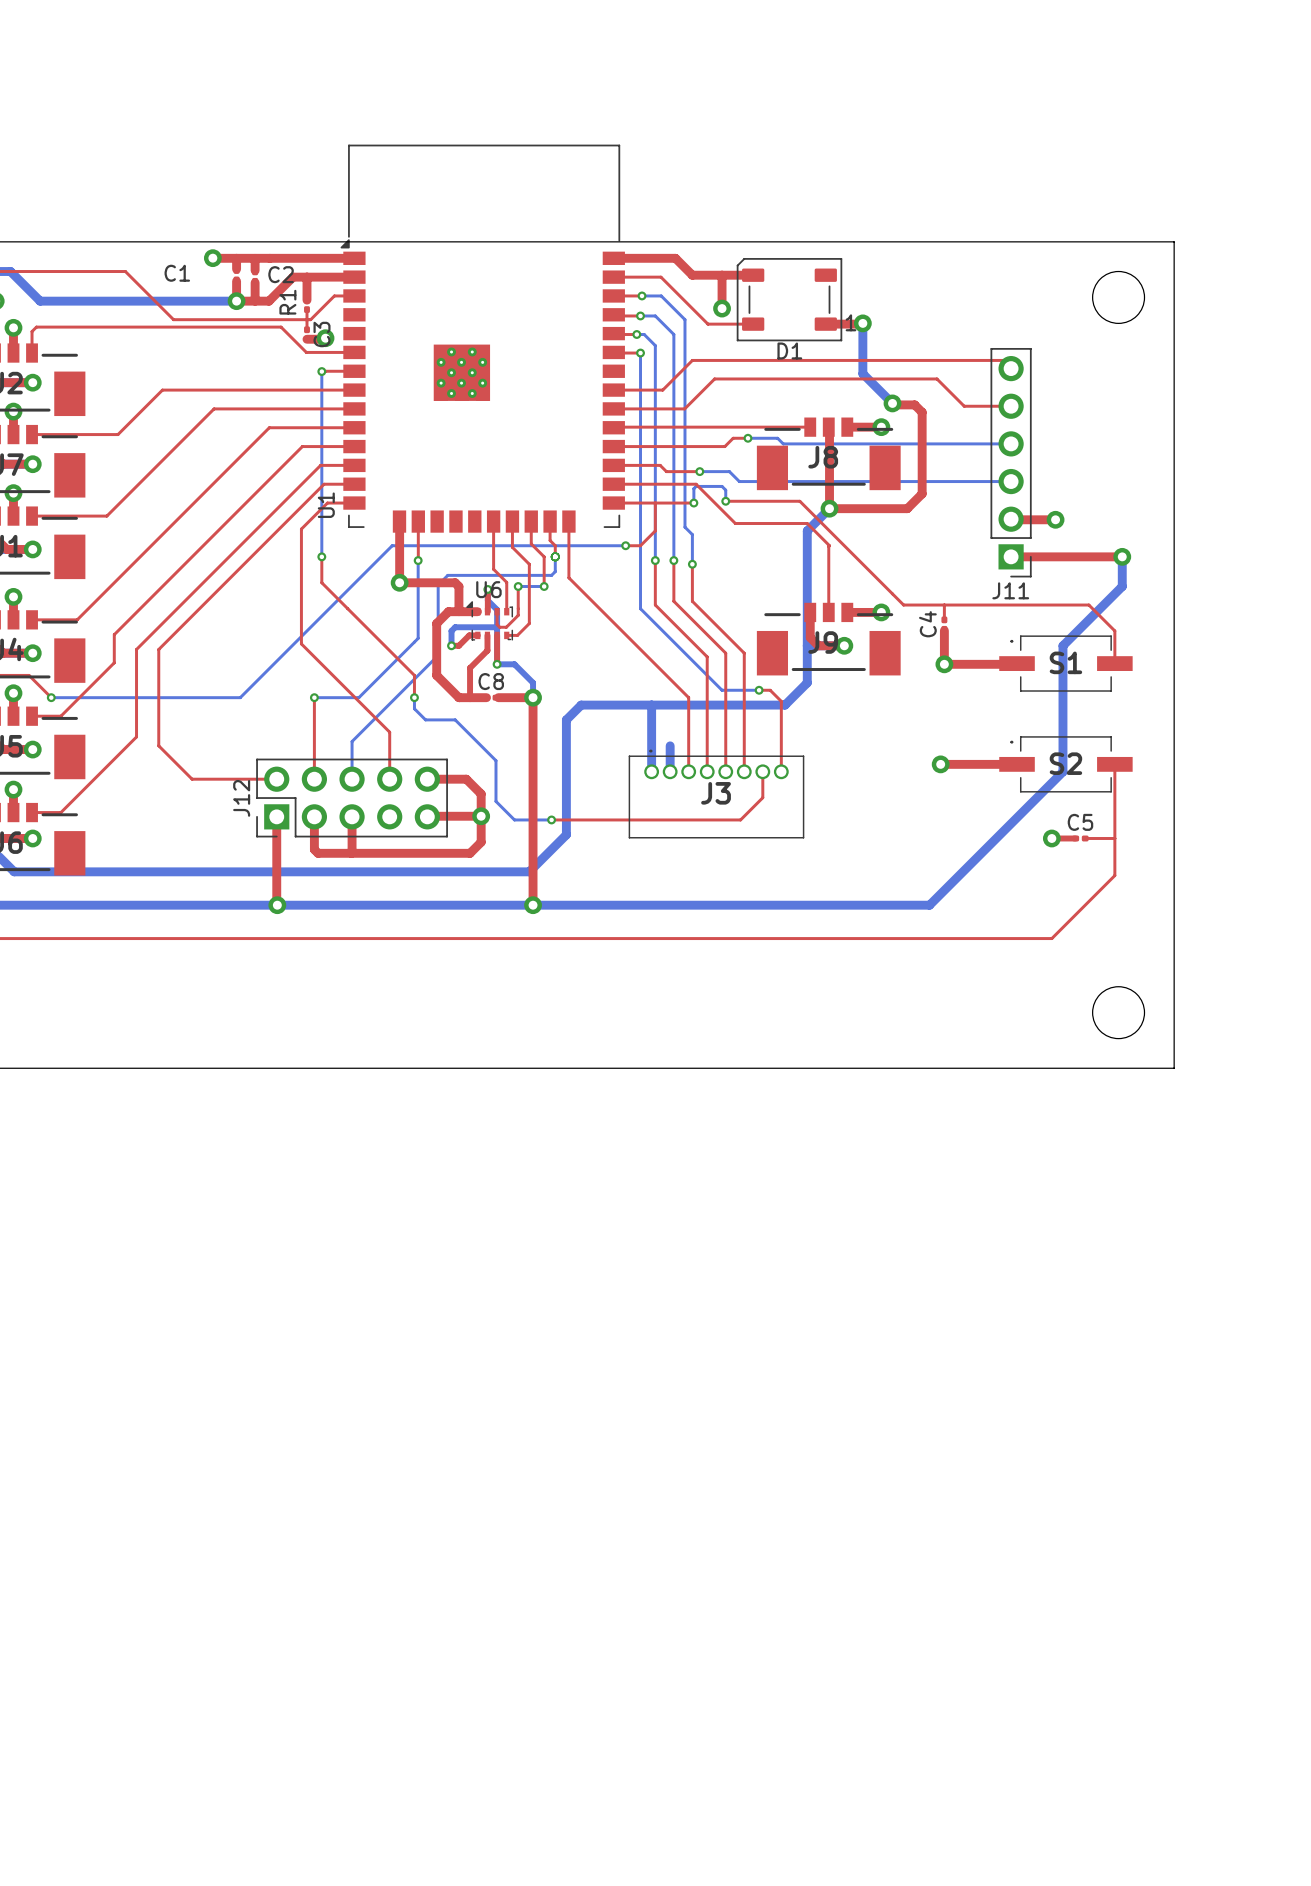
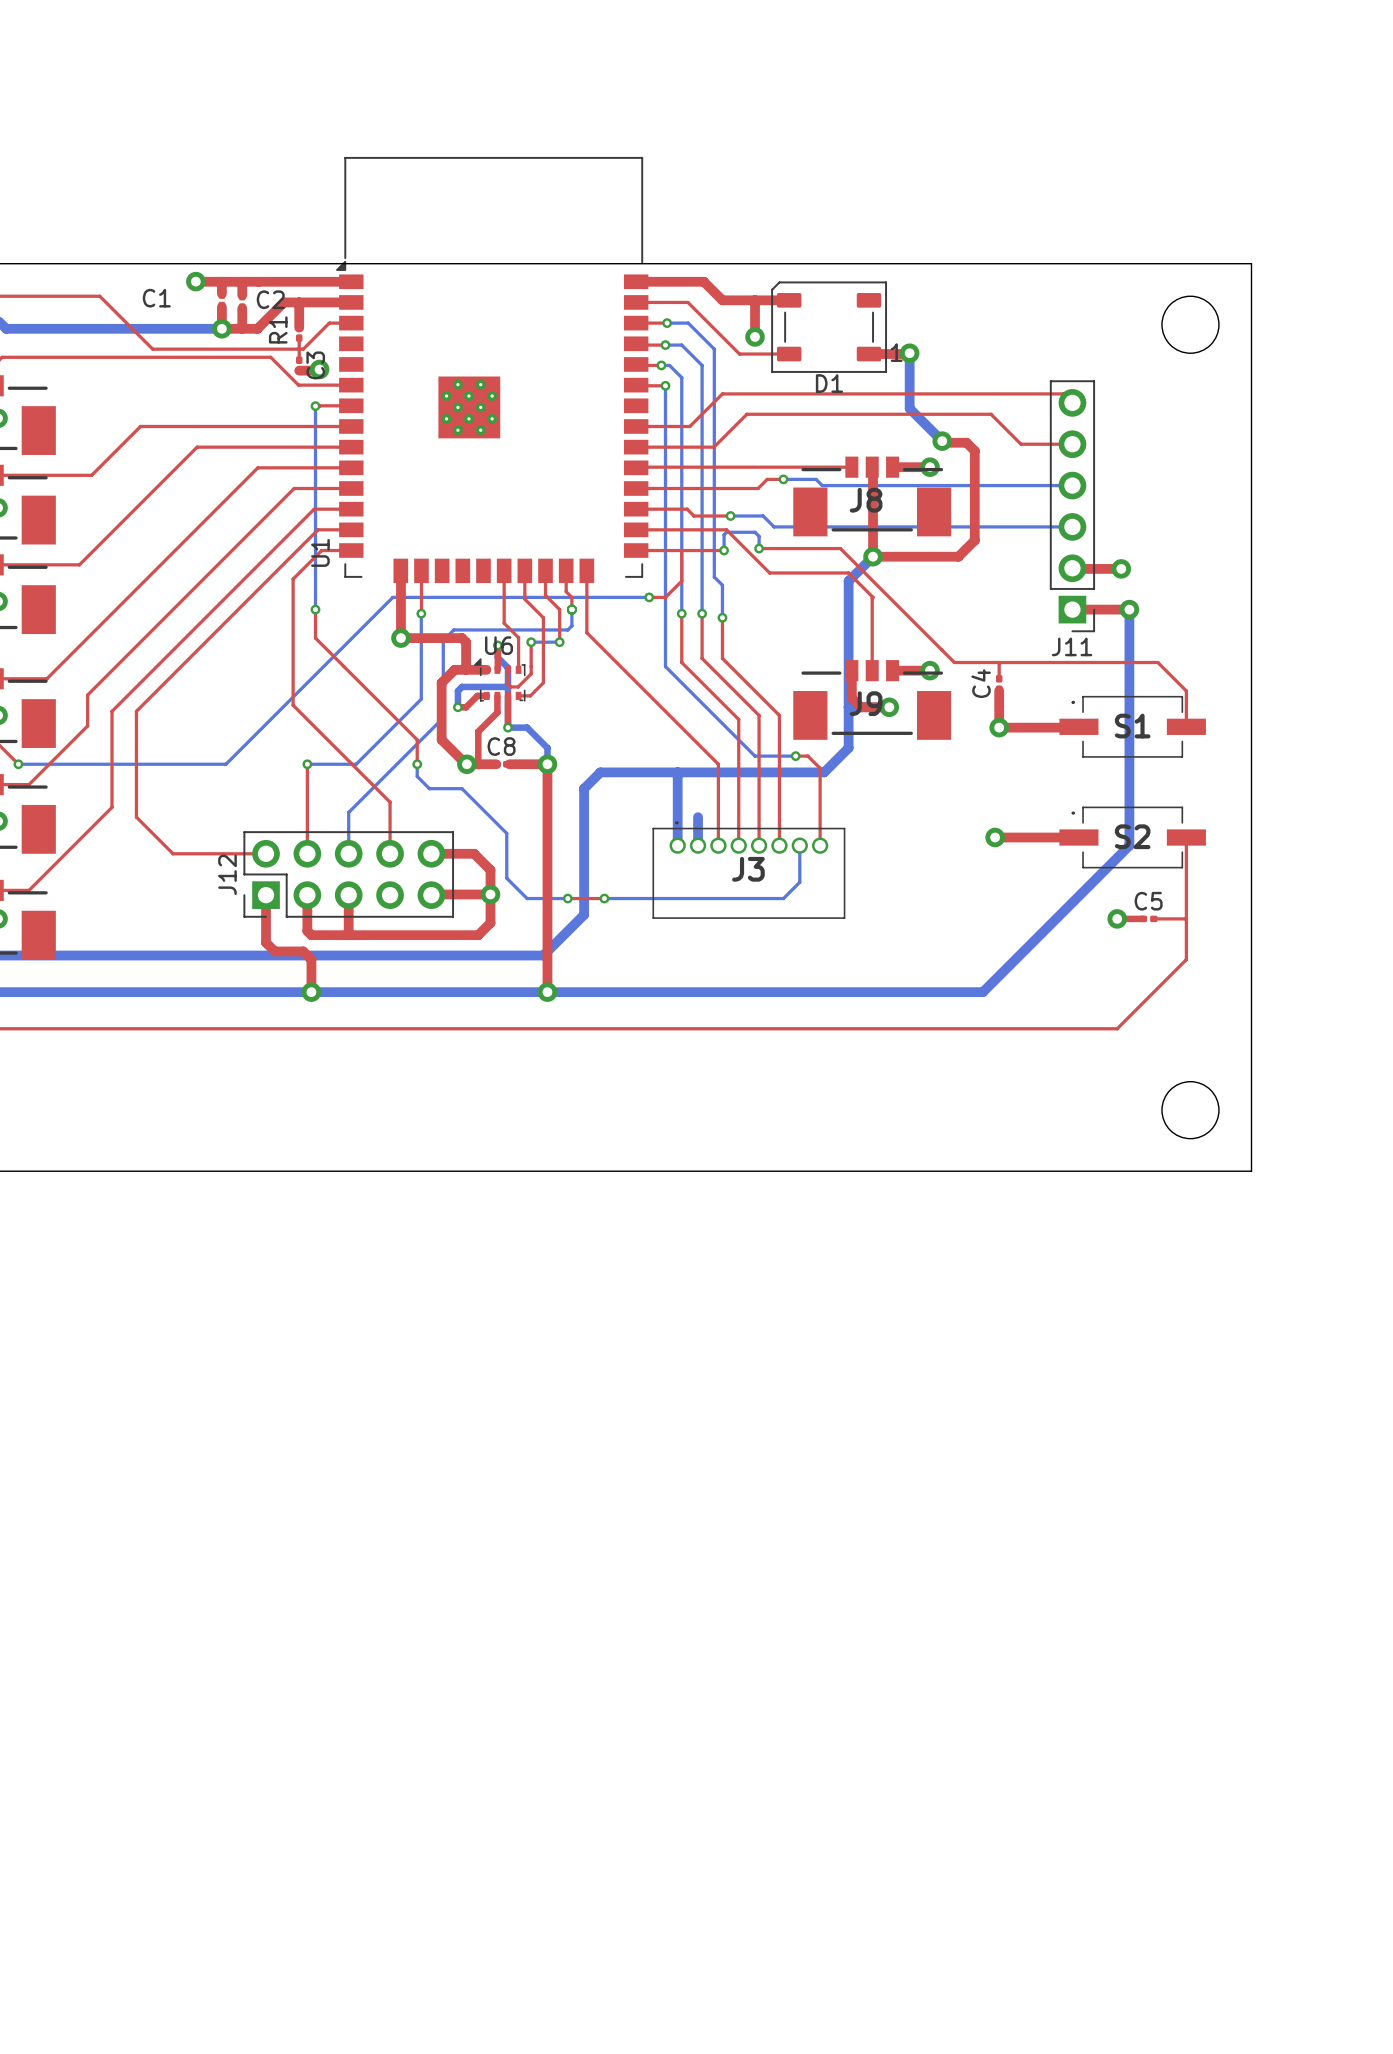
top track: (1062, 556) (1122, 556) -> none
bottom track: (1122, 556) (1122, 586) (1062, 645) -> (1129, 609) (1129, 707)
via position: (1122, 556) -> (1129, 609)
via: none -> (466, 764)
top track: (762, 771) (762, 797) (740, 819) (584, 819) -> none
bottom track: none -> (799, 845) (799, 882) (783, 898) (604, 898)
via: none -> (604, 898)
top track: (276, 860) (277, 905) -> (266, 942) (274, 951) (303, 951) (311, 959) (311, 992)
via position: (277, 905) -> (311, 992)

